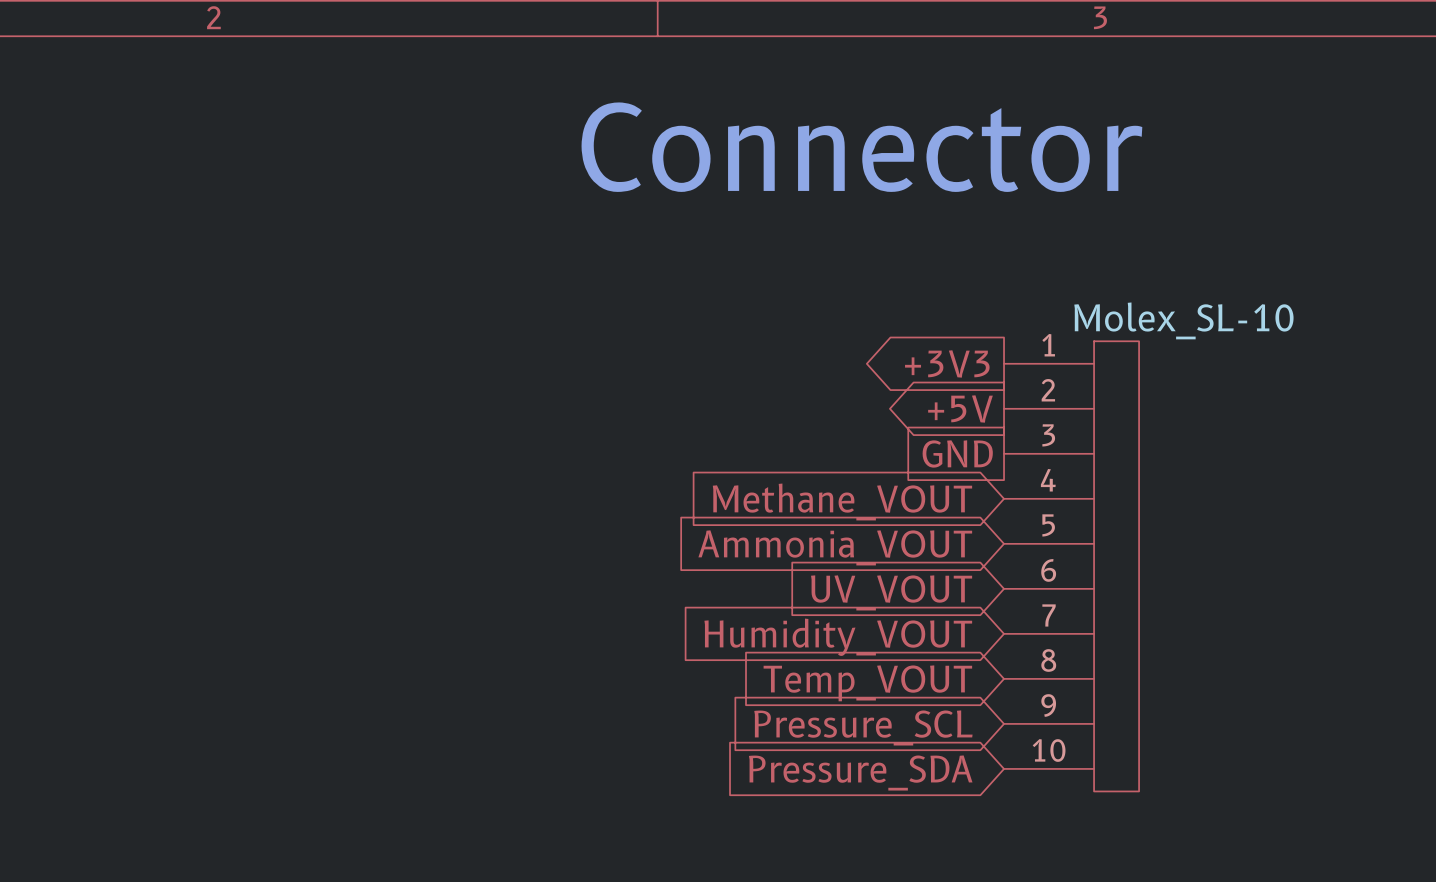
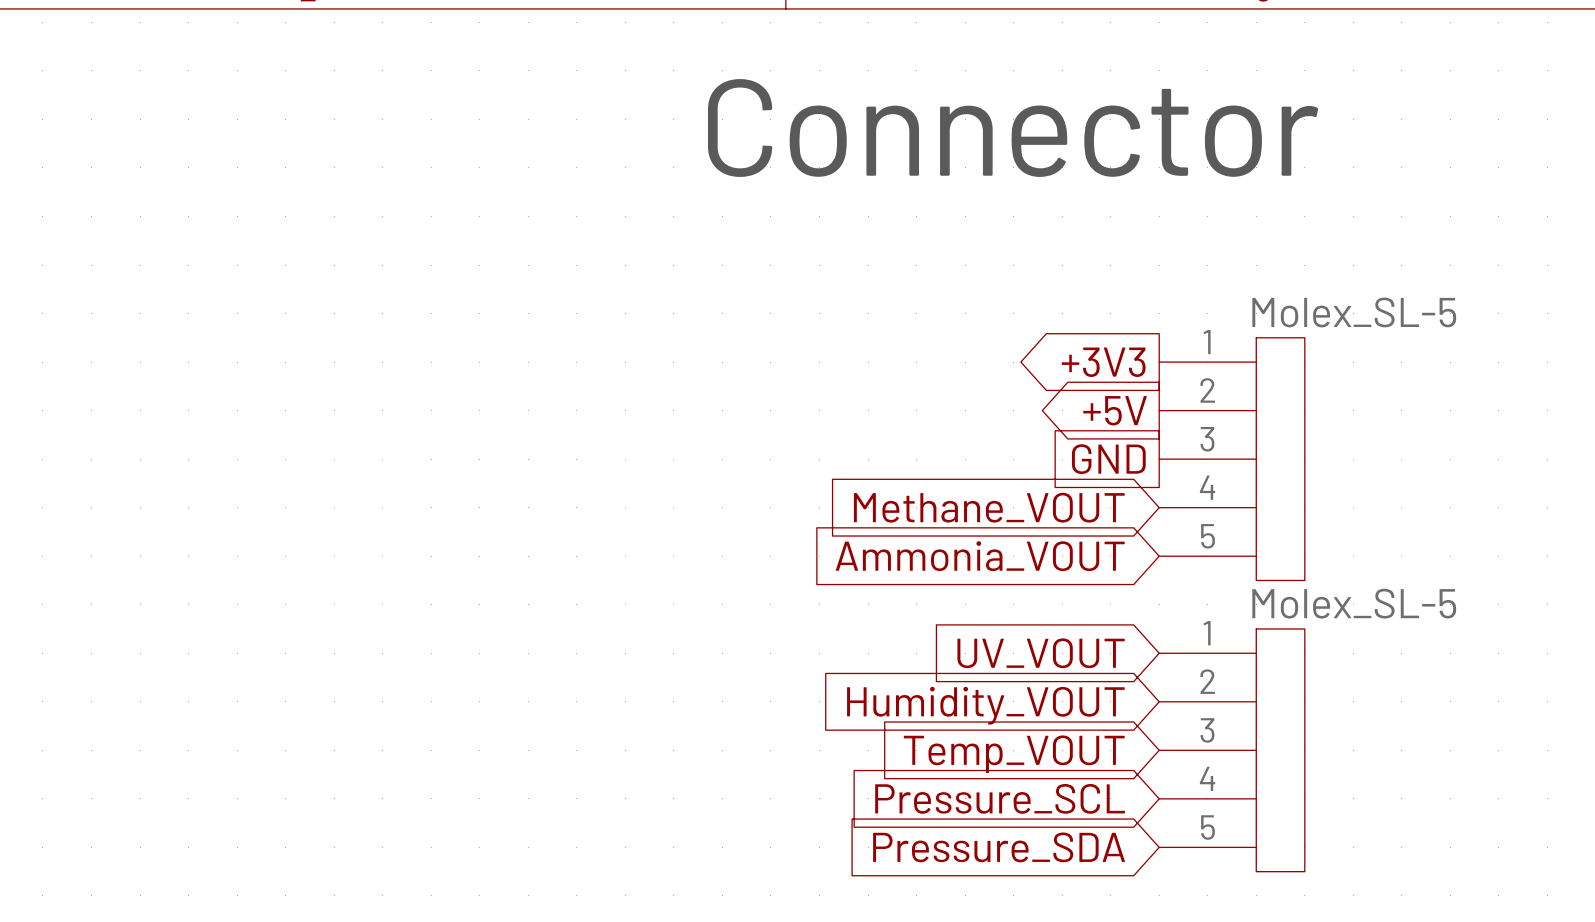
part: none -> Molex_SL-5 (1232, 459)
part: Molex_SL-10 (1071, 566) -> none
global label: UV_VOUT (891, 592) -> none
global label: Humidity_VOUT (838, 637) -> UV_VOUT (1041, 653)
global label: Temp_VOUT (867, 683) -> Humidity_VOUT (985, 705)
part: none -> Molex_SL-5 (1232, 750)
global label: Pressure_SCL (863, 727) -> Temp_VOUT (1014, 754)
global label: Pressure_SDA (860, 772) -> Pressure_SCL (1000, 798)
global label: none -> Pressure_SDA (999, 847)

